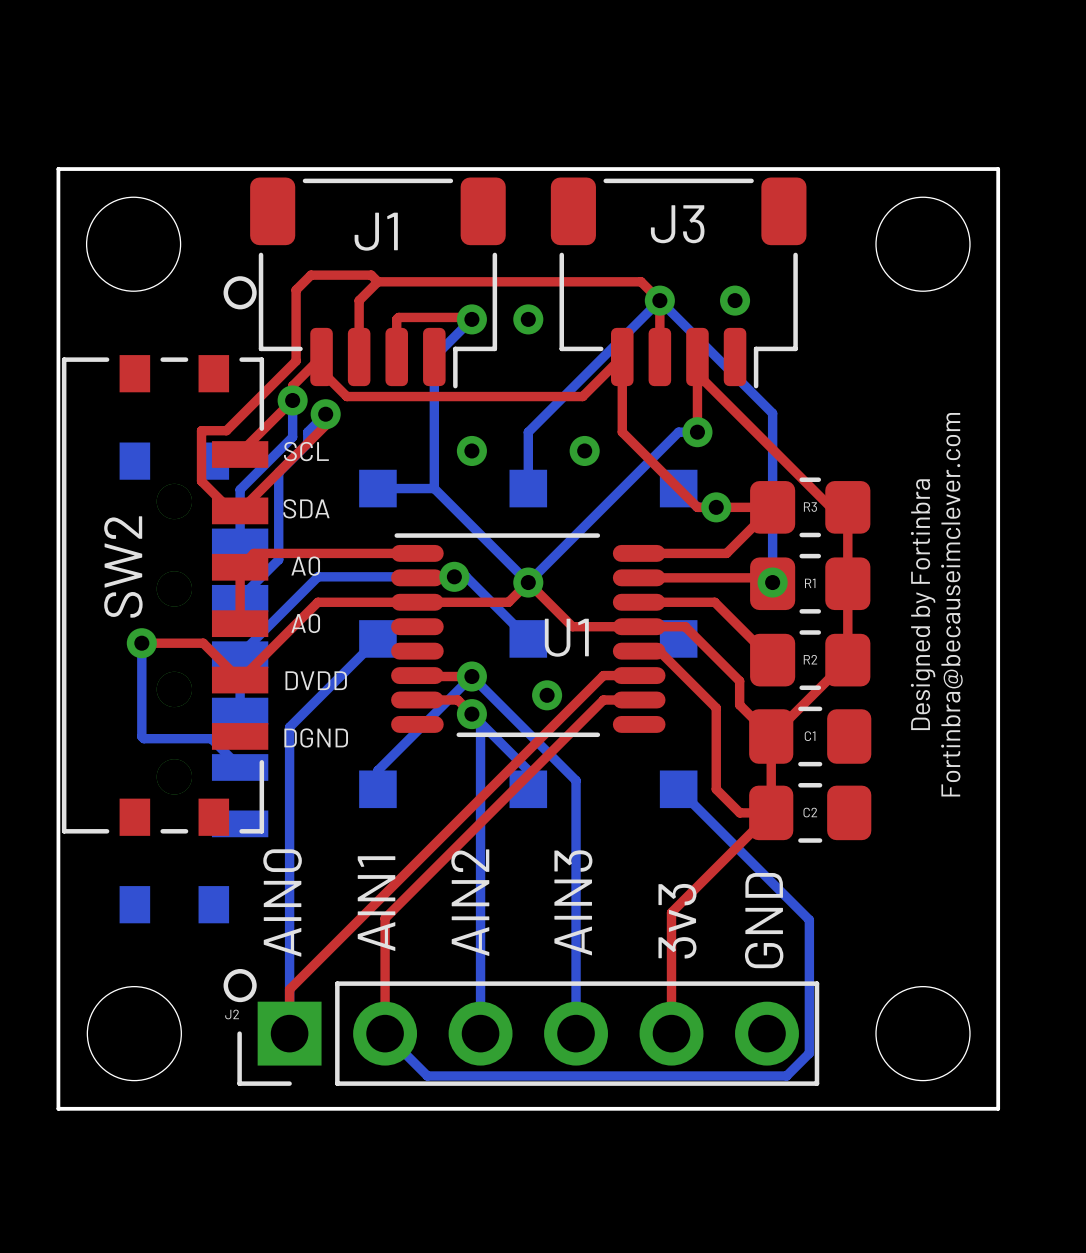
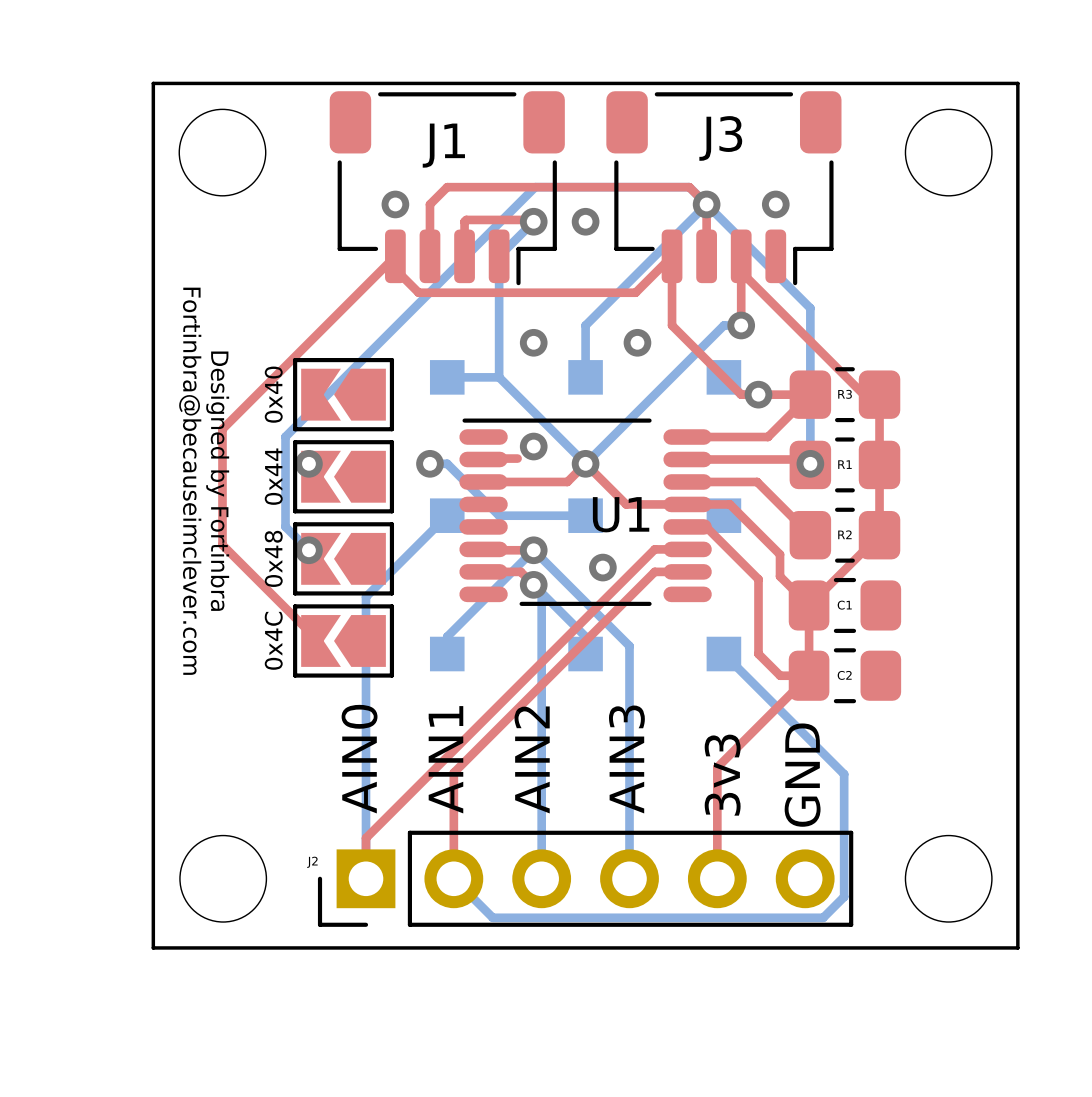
top track: (377, 281) (371, 275) (311, 275) (296, 290) (296, 361) (226, 430) (201, 430) (201, 481) (231, 510) -> none
via: none -> (395, 204)
bottom track: none -> (706, 204) (689, 187) (535, 187) (285, 436) (285, 526) (308, 550)
top track: (292, 385) (292, 400) (240, 454) -> (368, 282) (222, 429) (222, 545) (318, 640)
bottom track: (292, 400) (292, 437) (240, 489) (240, 541) -> none
via: (292, 400) -> none
top track: (325, 414) (325, 425) (240, 510) -> none
bottom track: (325, 414) (307, 432) (307, 443) (278, 472) (278, 559) (240, 598) -> none
via: (325, 414) -> none
text: SCL (306, 451) -> none
part: none -> (343, 394)
text: SDA (306, 508) -> none
top track: (417, 553) (253, 553) (240, 567) (240, 623) -> none
SW2: (165, 556) -> none
text: A0 (305, 566) -> none
via position: (454, 576) -> (533, 446)
via: none -> (308, 463)
via: none -> (429, 463)
part: none -> (343, 476)
top track: (417, 602) (317, 602) (240, 680) (203, 643) (141, 643) -> none
text rotation: 0° (923, 604) -> 180° (217, 481)
text position: Designed by Fortinbra (923, 604) -> Designed by Fortinbra (217, 481)
text rotation: 0° (951, 604) -> 180° (190, 481)
text position: Fortinbra@becauseimclever.com (951, 604) -> Fortinbra@becauseimclever.com (190, 481)
text: A0 (305, 623) -> none
bottom track: (528, 638) (466, 576) (318, 576) (240, 654) (240, 711) -> (585, 515) (499, 515) (447, 463) (429, 463)
bottom track: (141, 643) (141, 736) (143, 738) (211, 738) (240, 767) -> none
via: (141, 643) -> none
via: none -> (308, 550)
text: DVDD (316, 680) -> none
part: none -> (343, 558)
part: (193, 722) -> none
text: DGND (316, 737) -> none
part: none -> (343, 640)

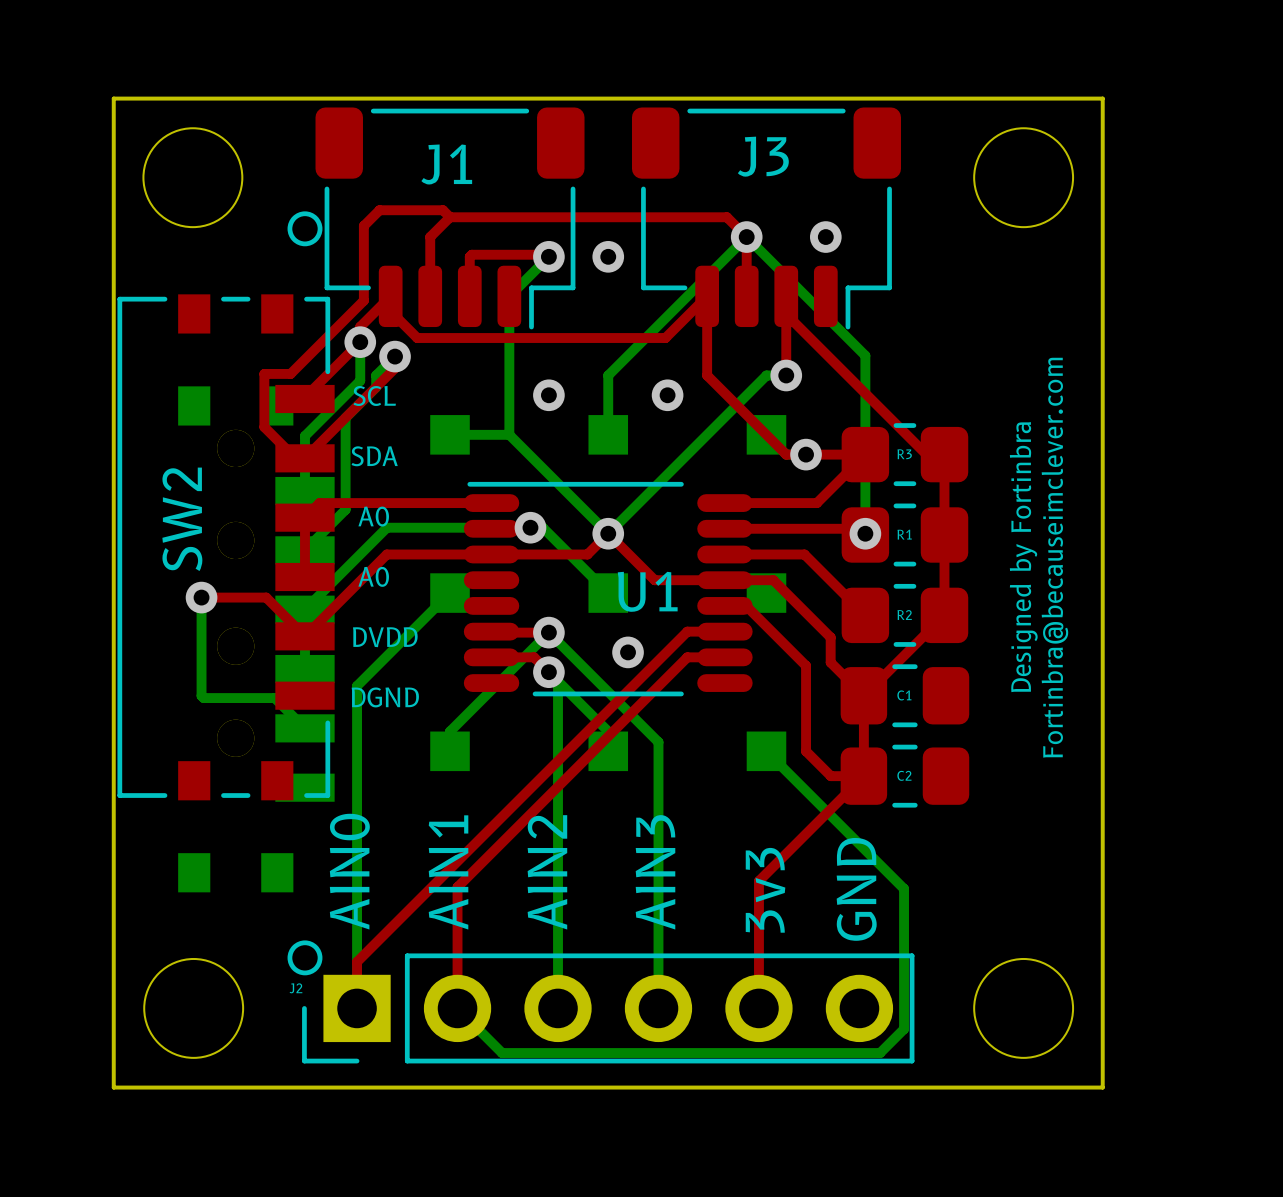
top track: none -> (450, 217) (442, 210) (379, 210) (363, 225) (363, 300) (290, 373) (264, 373) (264, 427) (295, 458)
via: (395, 204) -> none
bottom track: (706, 204) (689, 187) (535, 187) (285, 436) (285, 526) (308, 550) -> none
top track: (368, 282) (222, 429) (222, 545) (318, 640) -> (360, 326) (360, 342) (304, 398)
bottom track: none -> (360, 342) (360, 380) (304, 436) (304, 491)
via: none -> (360, 342)
top track: none -> (395, 356) (395, 368) (304, 458)
bottom track: none -> (395, 356) (376, 375) (376, 387) (345, 417) (345, 509) (304, 550)
via: none -> (395, 356)
text: none -> SCL (374, 395)
part: (343, 394) -> none
text: none -> SDA (374, 456)
top track: none -> (491, 503) (319, 503) (304, 517) (304, 577)
SW2: none -> (226, 505)
via position: (533, 446) -> (530, 527)
text: none -> A0 (373, 516)
via: (308, 463) -> none
bottom track: (429, 463) (447, 463) (499, 515) (585, 515) -> (304, 669) (304, 609) (386, 527) (542, 527) (608, 593)
via: (429, 463) -> none
part: (343, 476) -> none
text rotation: 0° (190, 481) -> 180° (1054, 557)
text position: Fortinbra@becauseimclever.com (190, 481) -> Fortinbra@becauseimclever.com (1054, 557)
text rotation: 0° (217, 481) -> 180° (1023, 557)
text position: Designed by Fortinbra (217, 481) -> Designed by Fortinbra (1023, 557)
top track: none -> (491, 554) (386, 554) (304, 636) (266, 597) (201, 597)
text: none -> A0 (373, 576)
bottom track: none -> (201, 597) (201, 695) (203, 698) (274, 698) (304, 728)
via: none -> (201, 597)
via: (308, 550) -> none
text: none -> DVDD (385, 637)
part: (343, 558) -> none
part: none -> (256, 680)
text: none -> DGND (385, 697)
part: (343, 640) -> none

